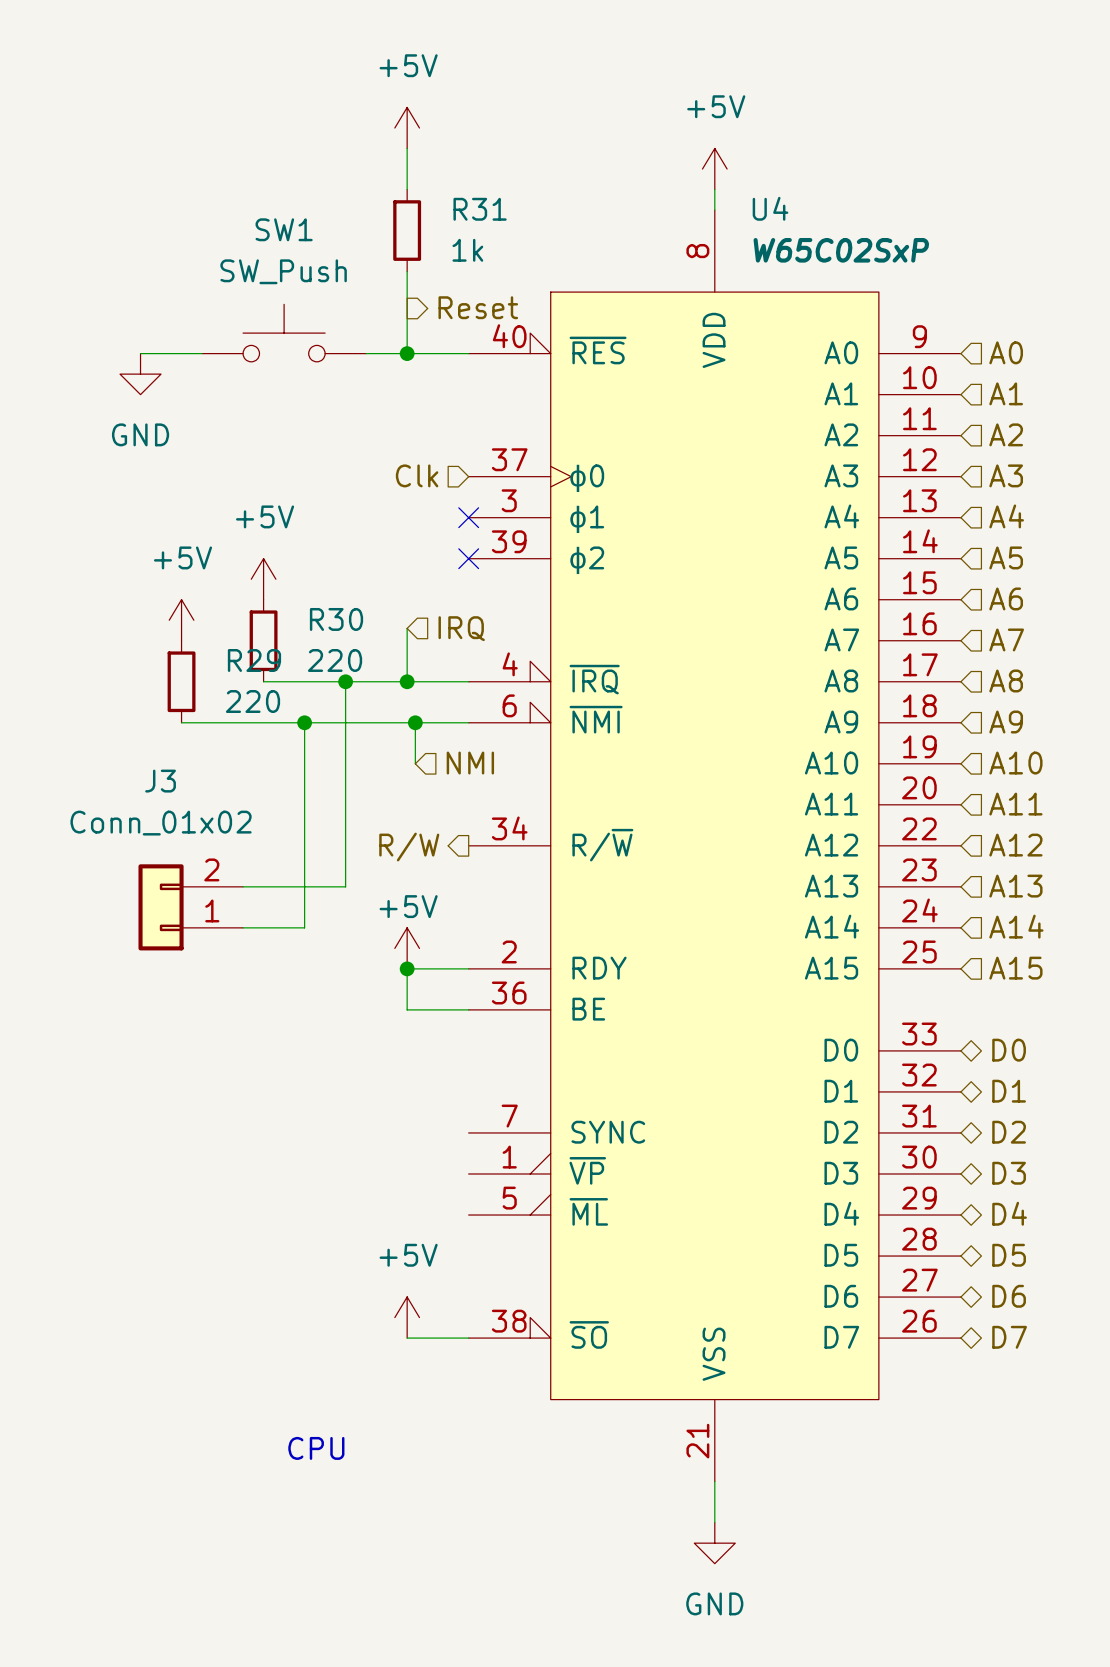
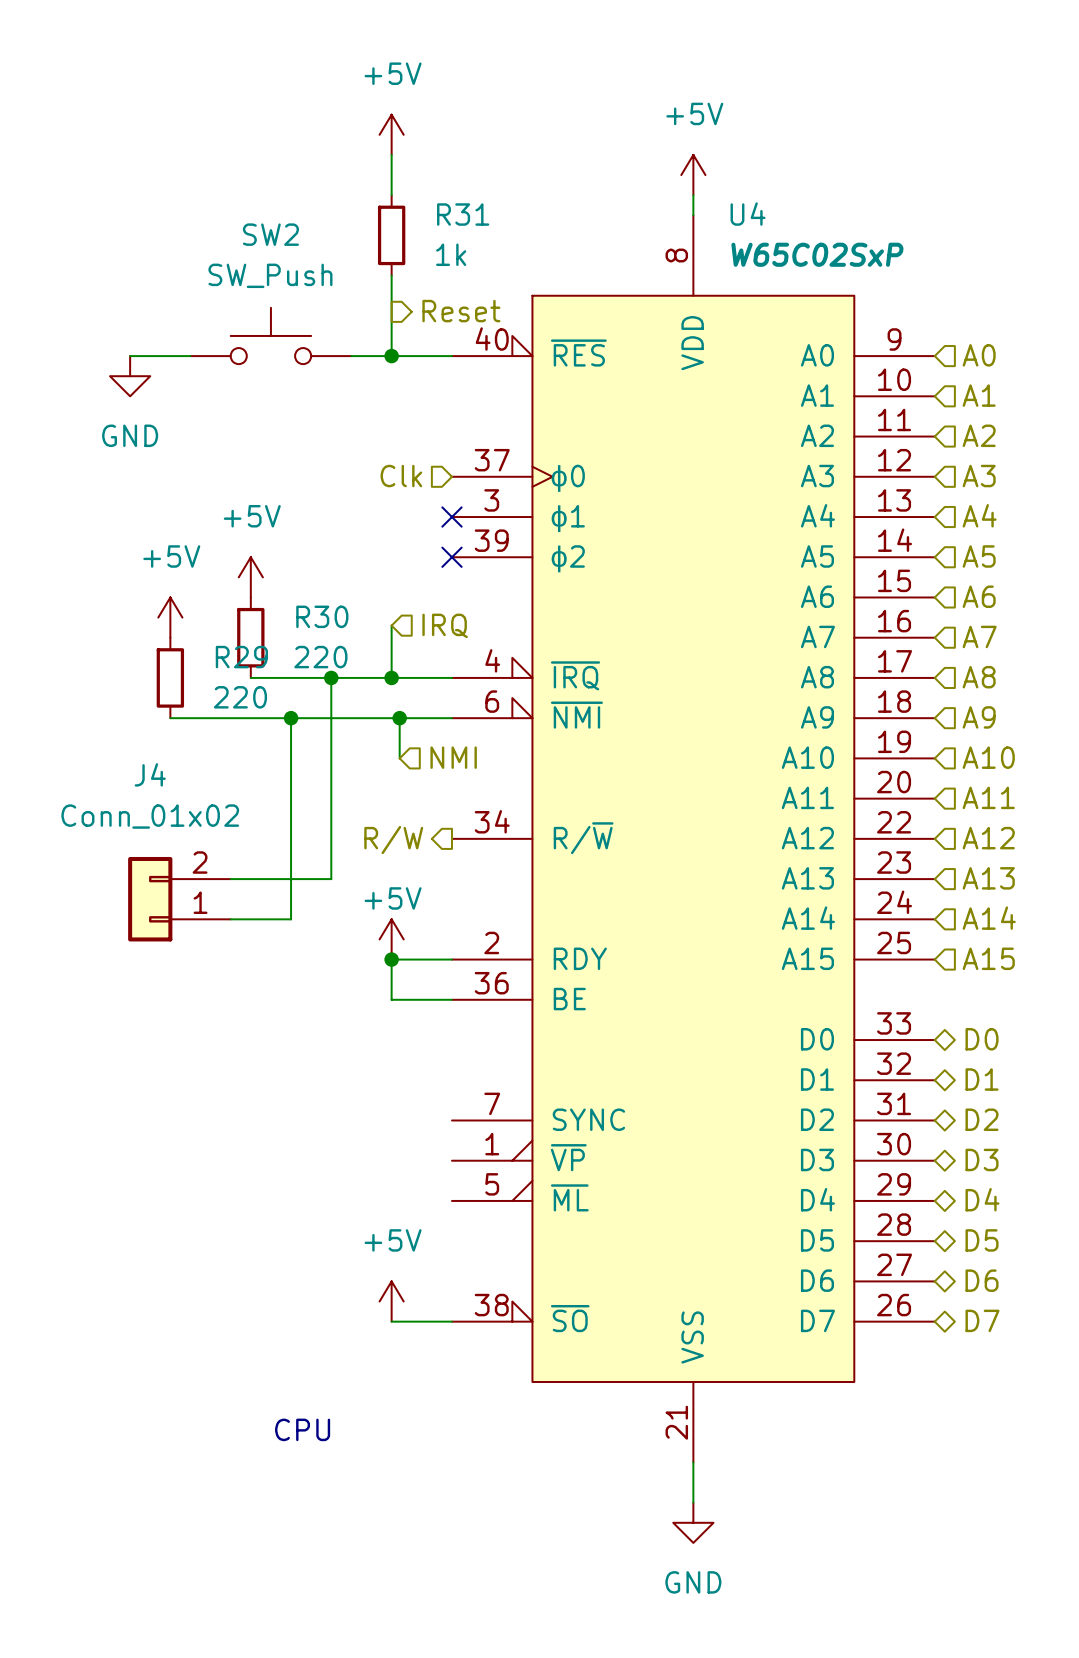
SW1 name: SW1 (284, 229) -> SW2 (270, 234)
J3 name: J3 (160, 781) -> J4 (150, 774)

